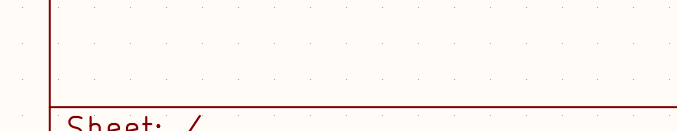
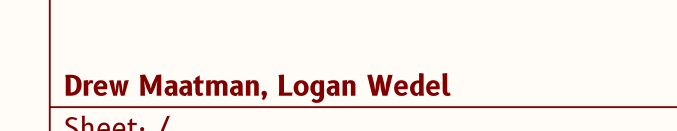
title block: none -> Drew Maatman, Logan Wedel (257, 87)

